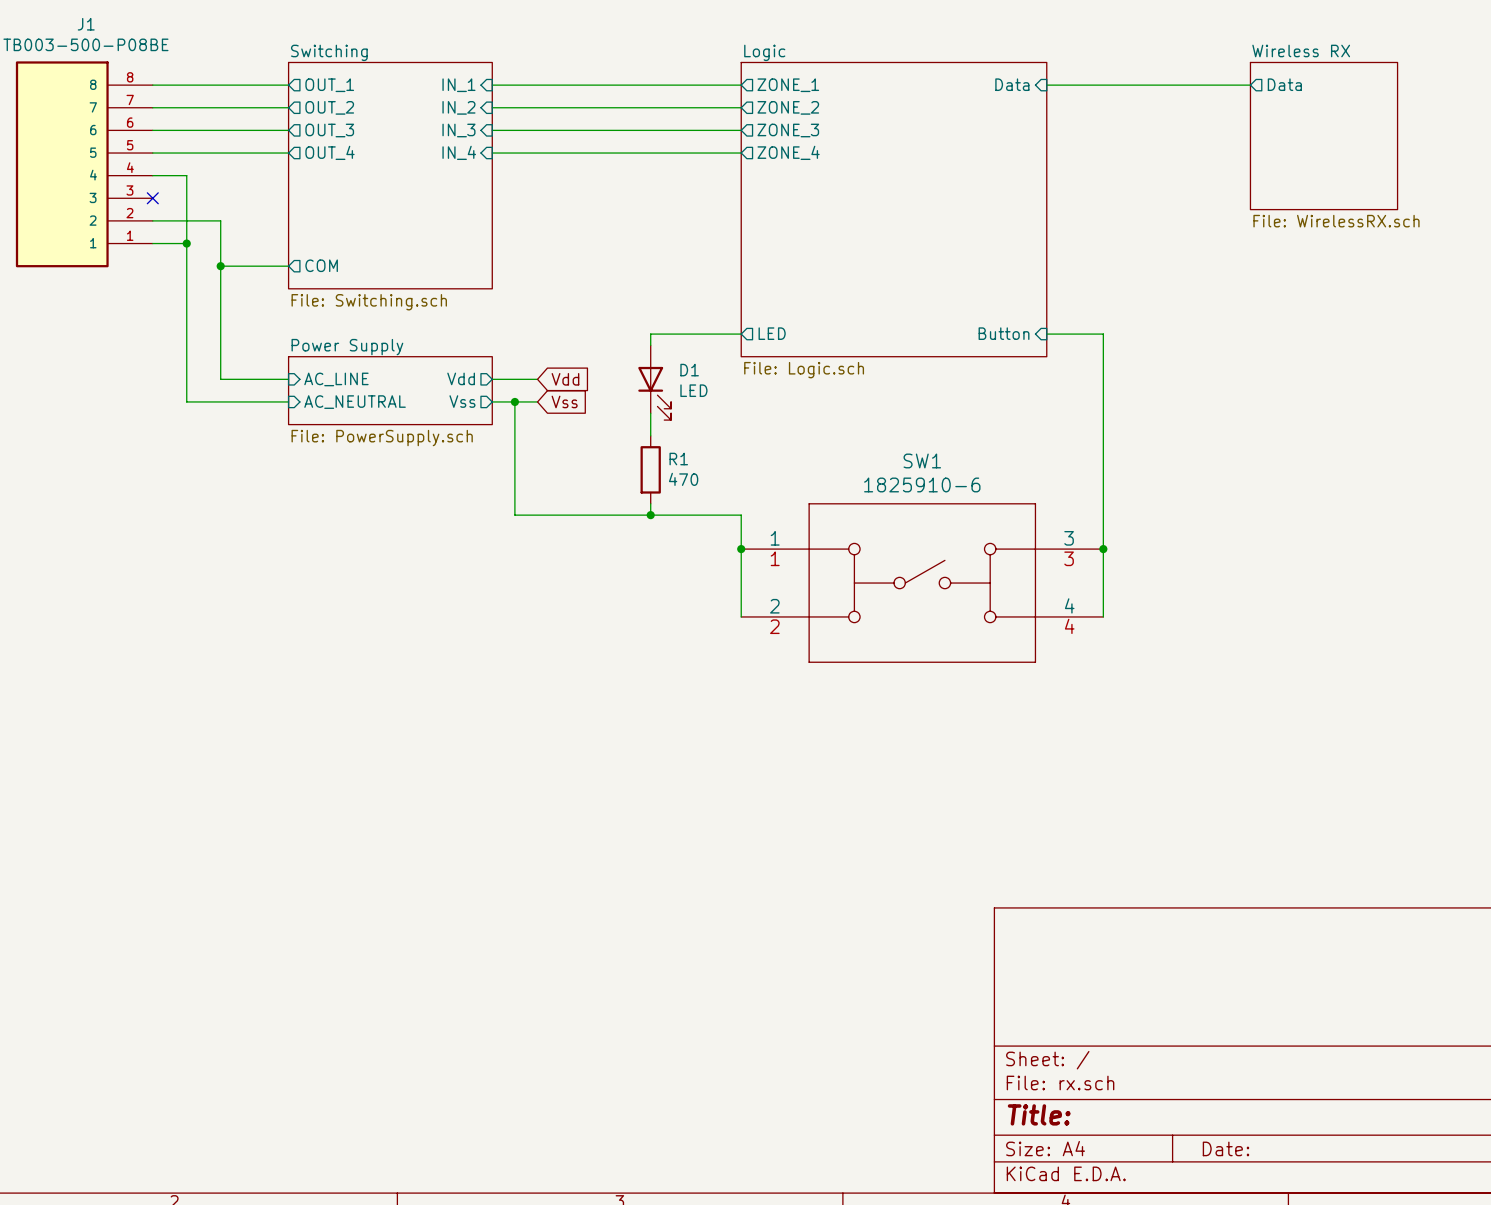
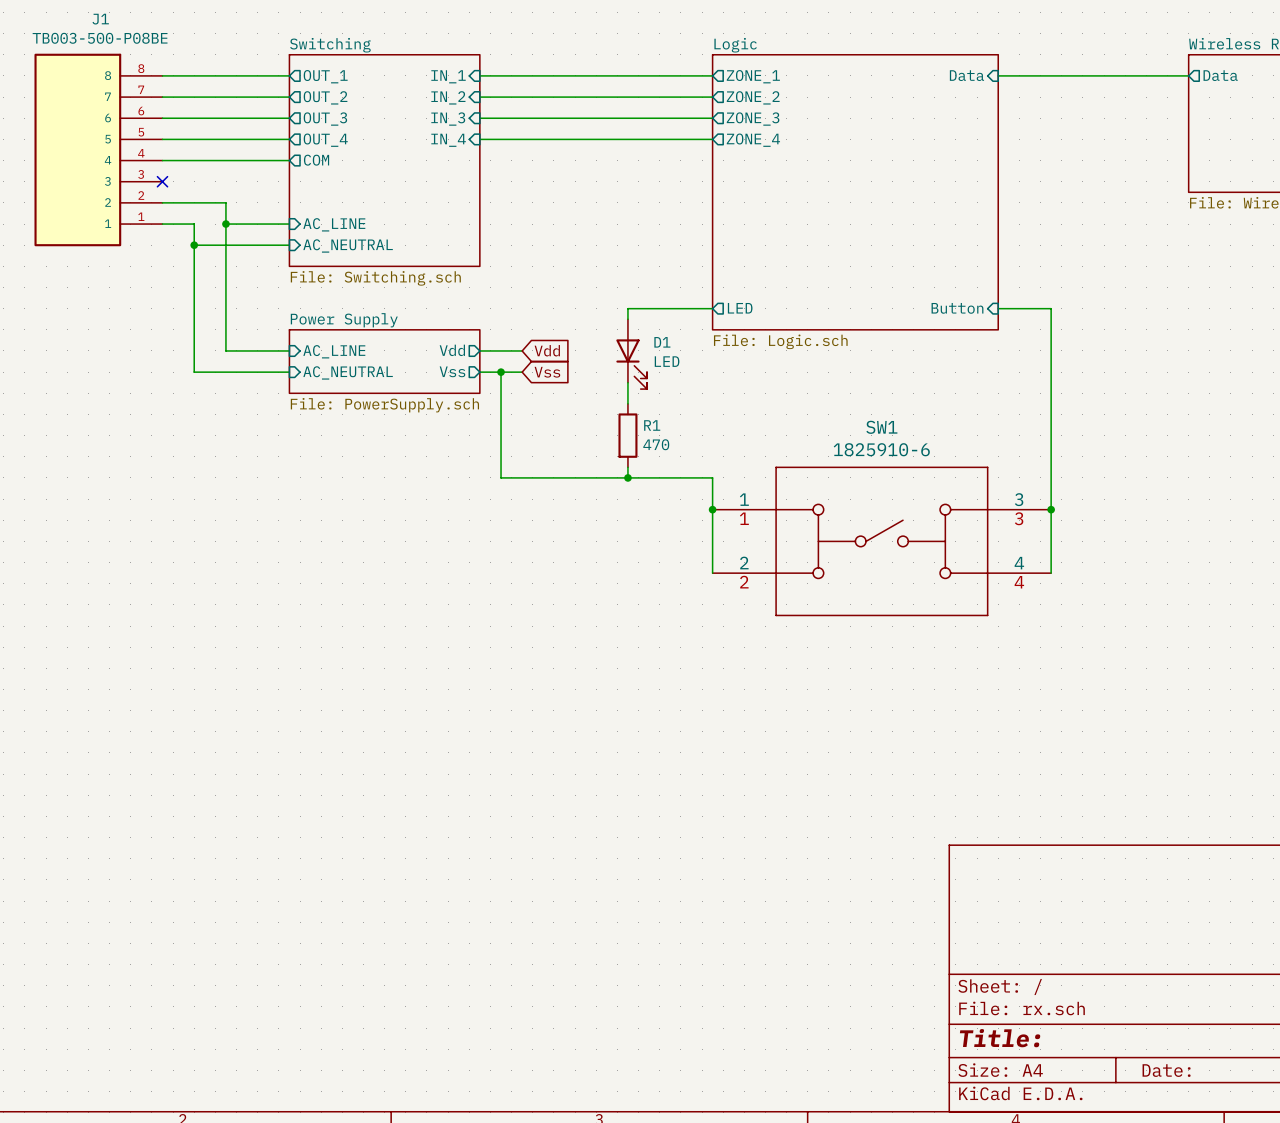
wire: (186, 175) (186, 243) -> (194, 160) (289, 160)
sheet pin: none -> COM (316, 160)
junction: (186, 243) -> none
wire: none -> (225, 224) (289, 224)
junction: none -> (225, 224)
sheet pin: none -> AC_LINE (334, 224)
sheet pin shape: output (321, 265) -> input (348, 245)
sheet pin: COM (321, 265) -> AC_NEUTRAL (348, 245)
wire: none -> (194, 245) (225, 245)
junction: none -> (194, 245)
junction: (220, 266) -> none

